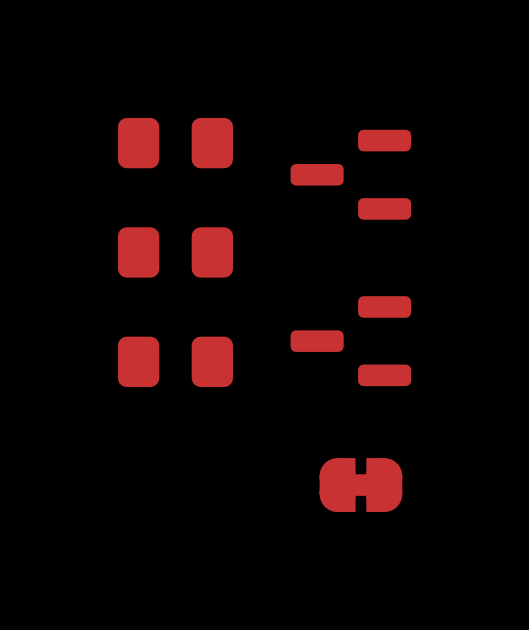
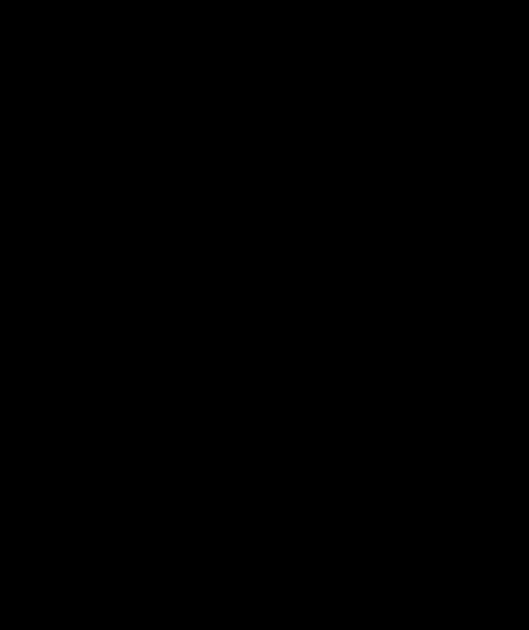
part: (175, 143) -> none
part: (350, 174) -> none
part: (175, 252) -> none
part: (350, 341) -> none
part: (175, 361) -> none
part: (360, 485) -> none

